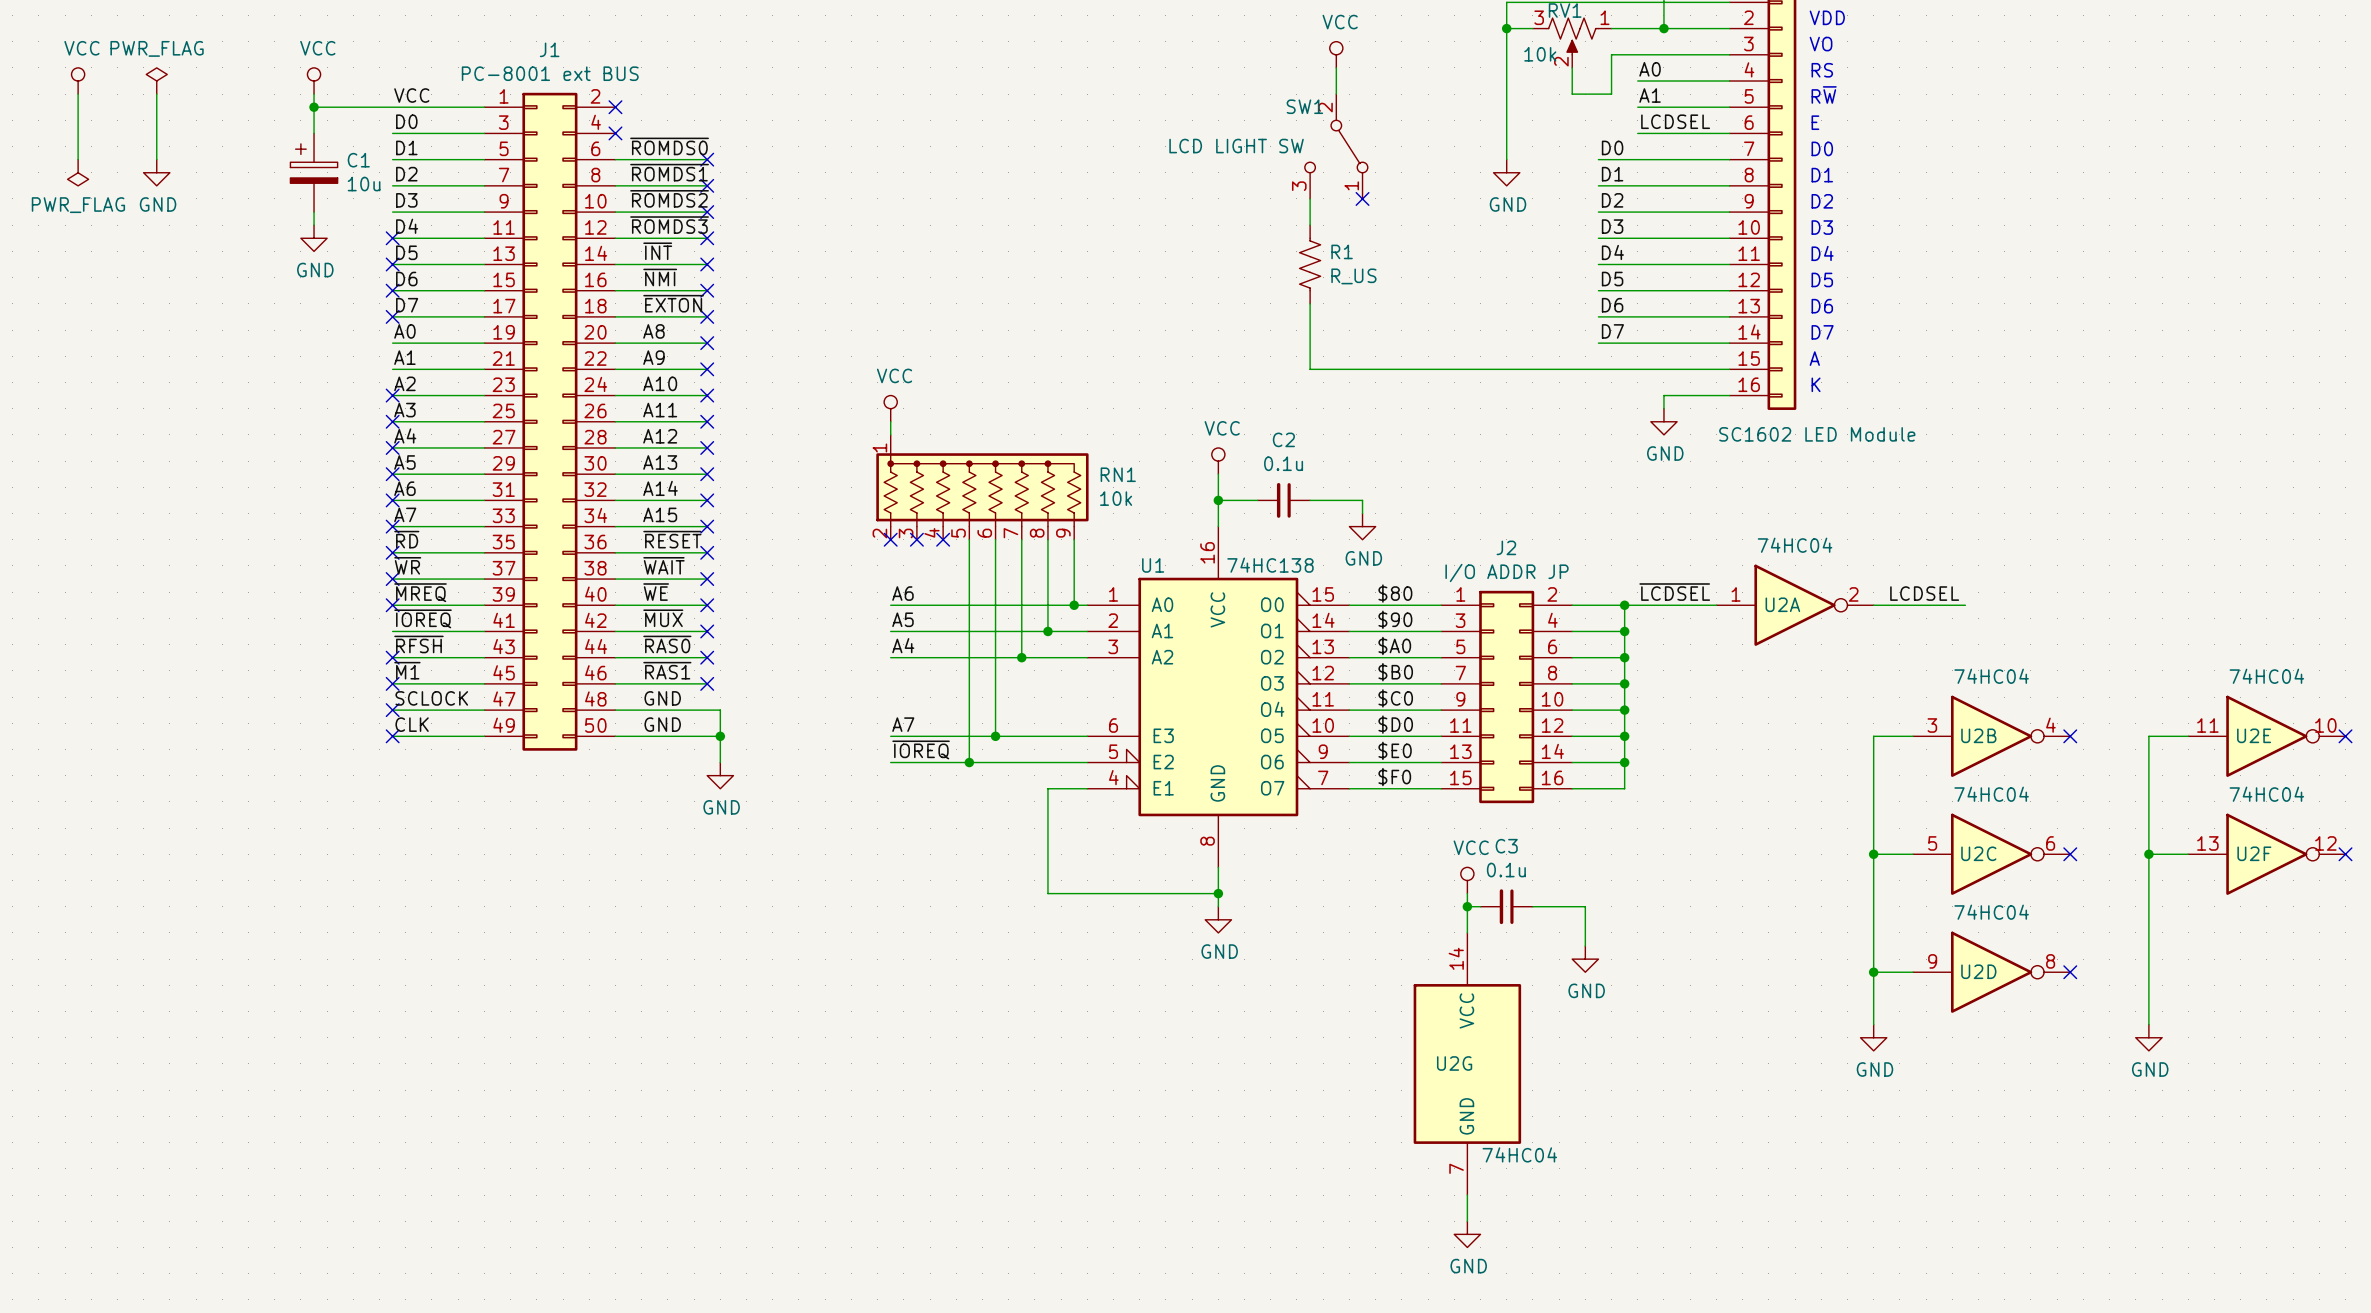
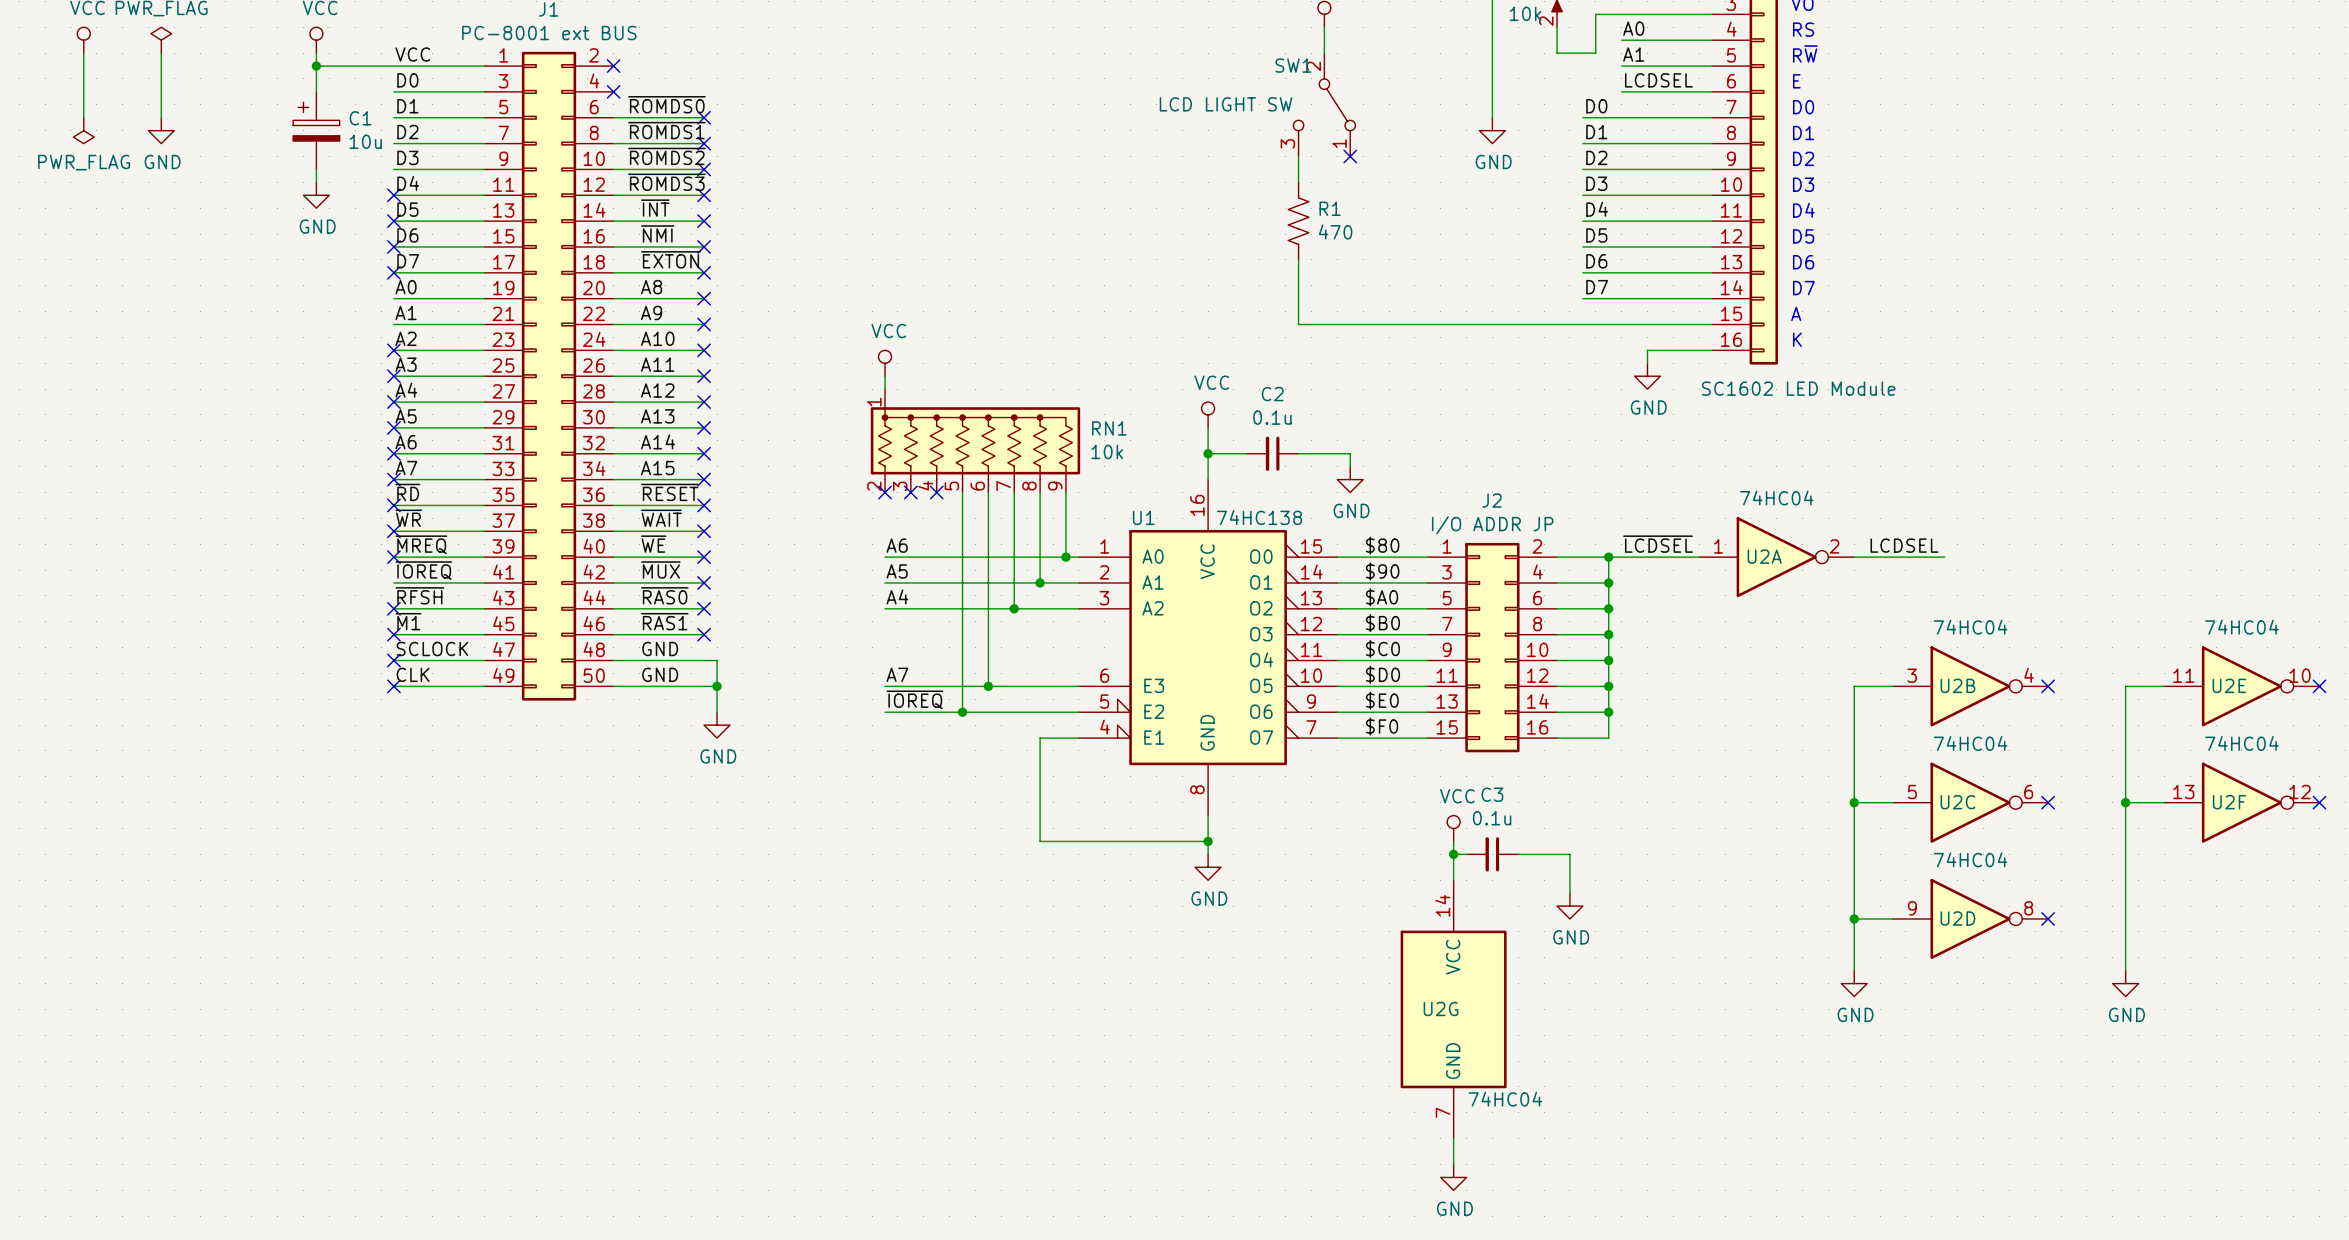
R1 value: R_US (1353, 276) -> 470 (1335, 231)

